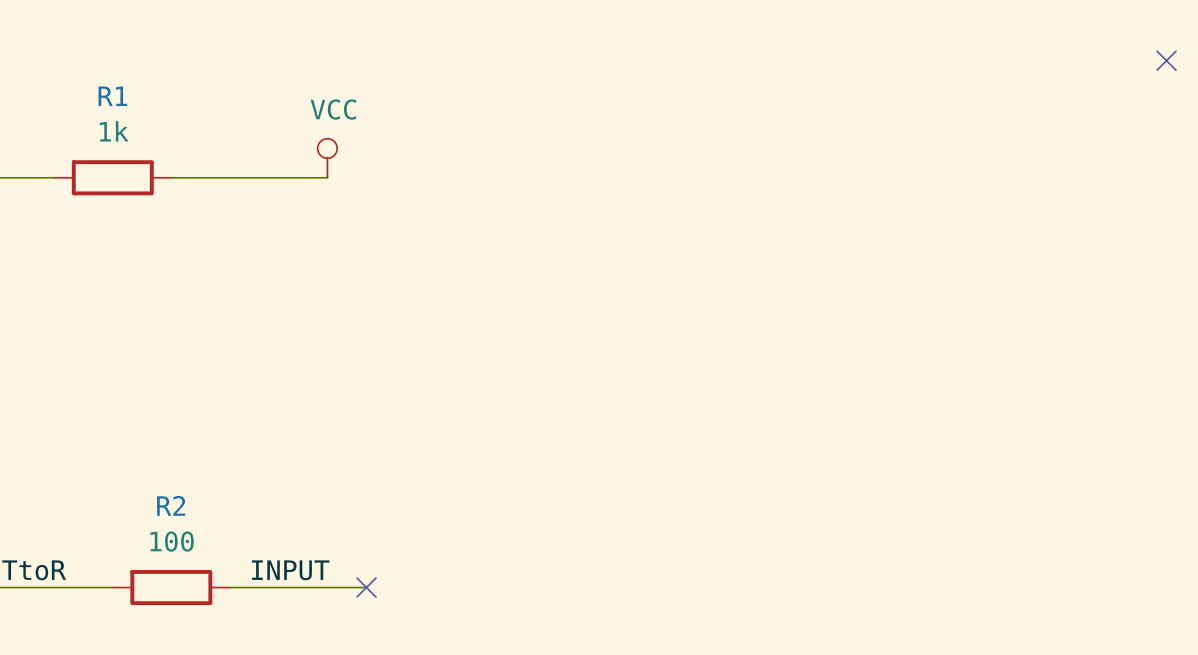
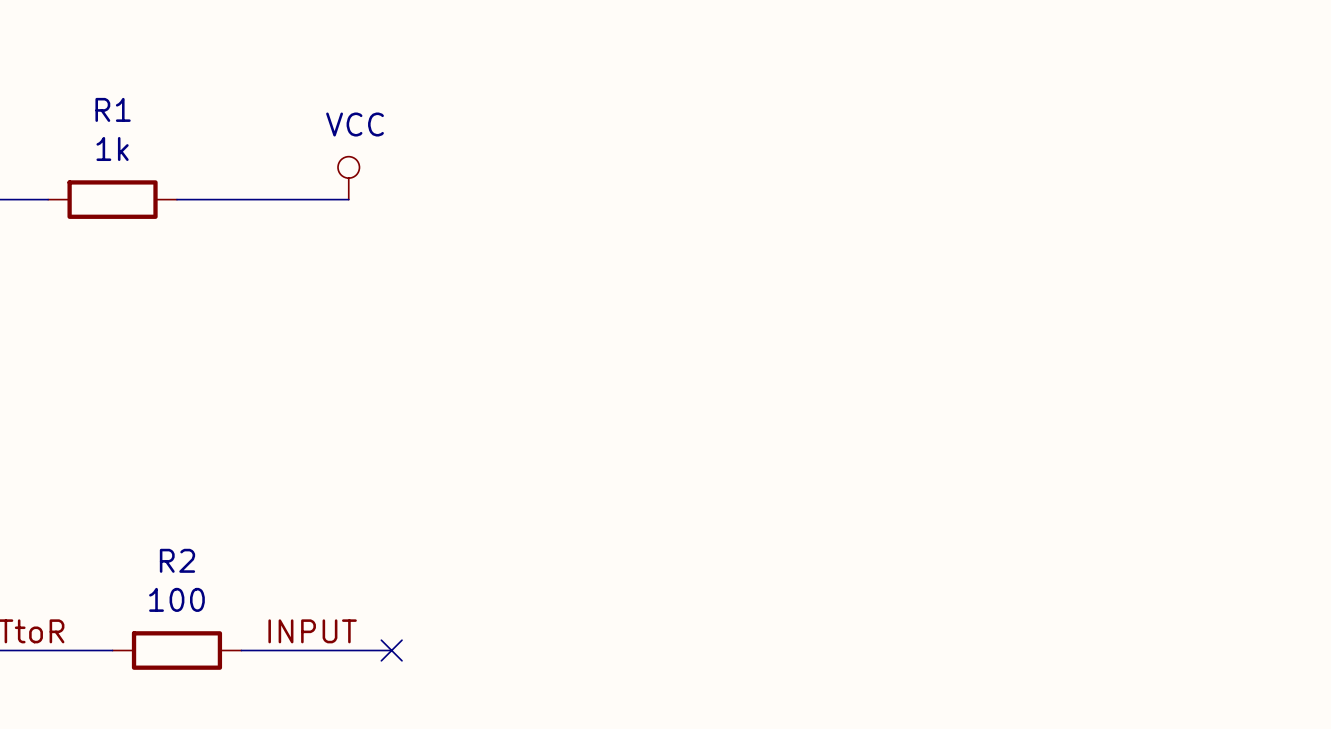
no-connect mark: (1166, 60) -> none

